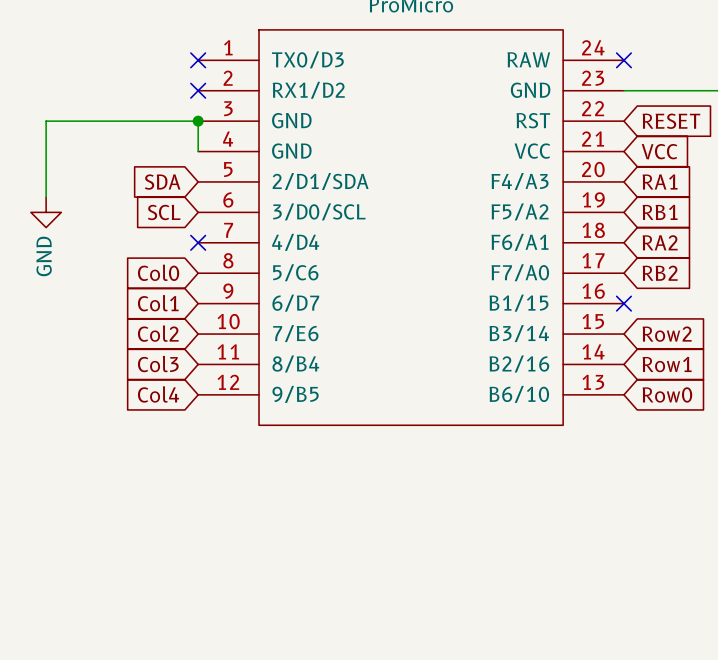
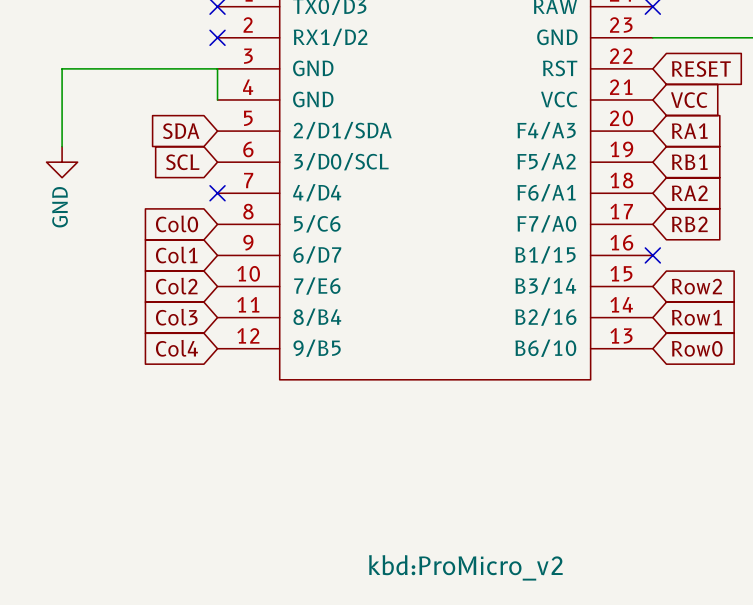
junction: (198, 121) -> none
part text: none -> kbd:ProMicro_v2 (465, 567)

